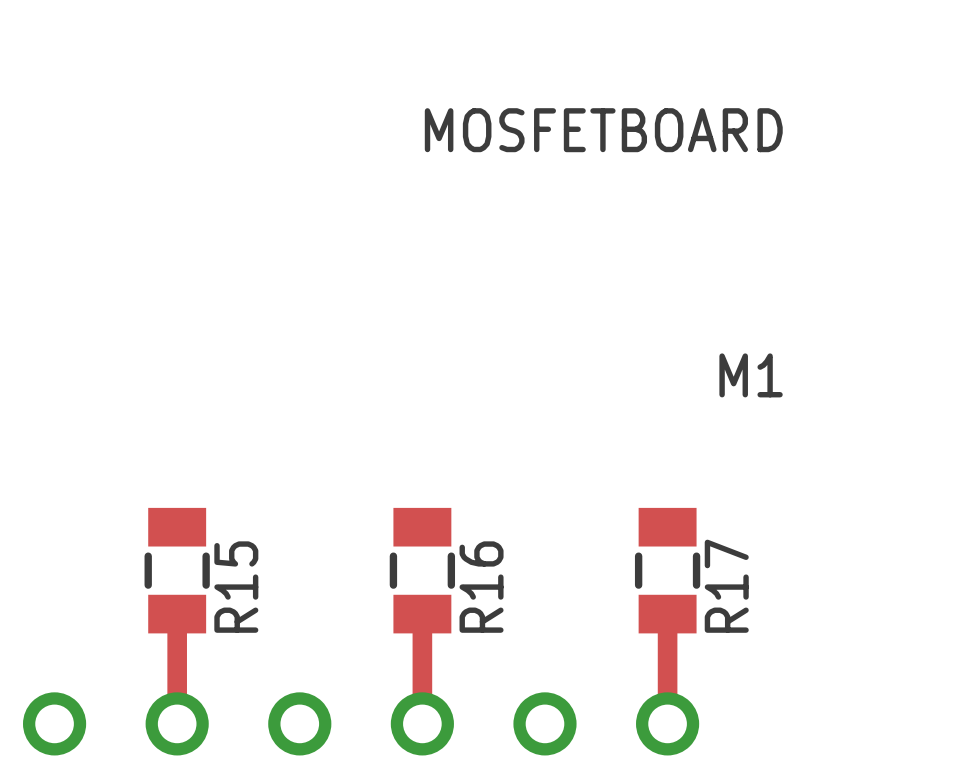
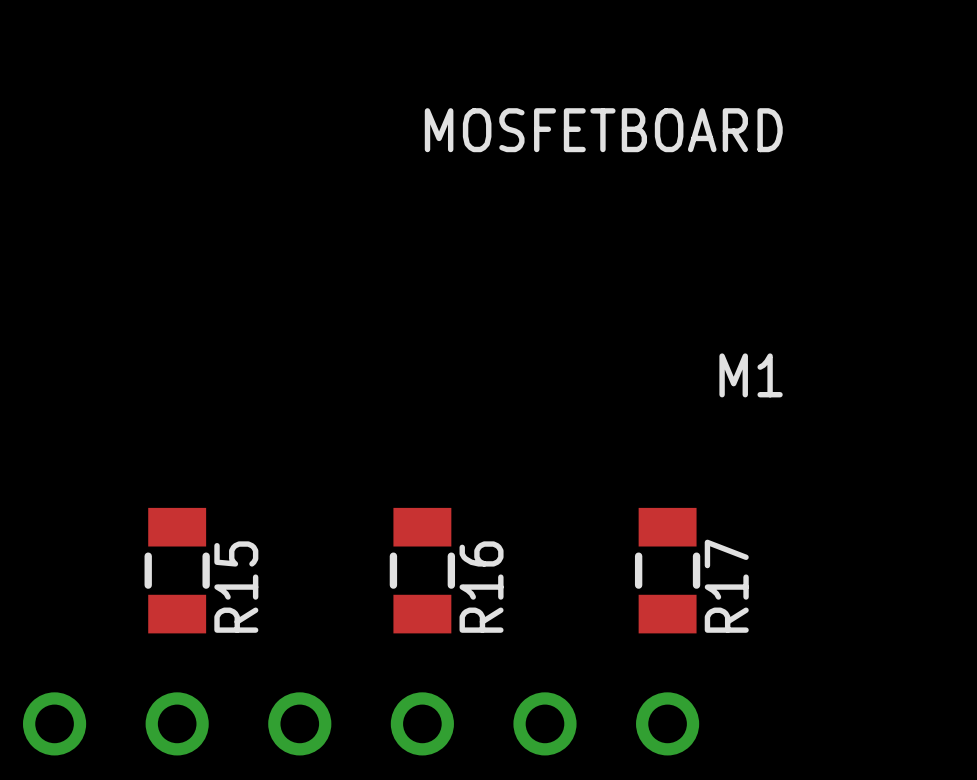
track: (177, 614) (177, 723) -> none
track: (422, 614) (422, 723) -> none
track: (667, 614) (667, 723) -> none

